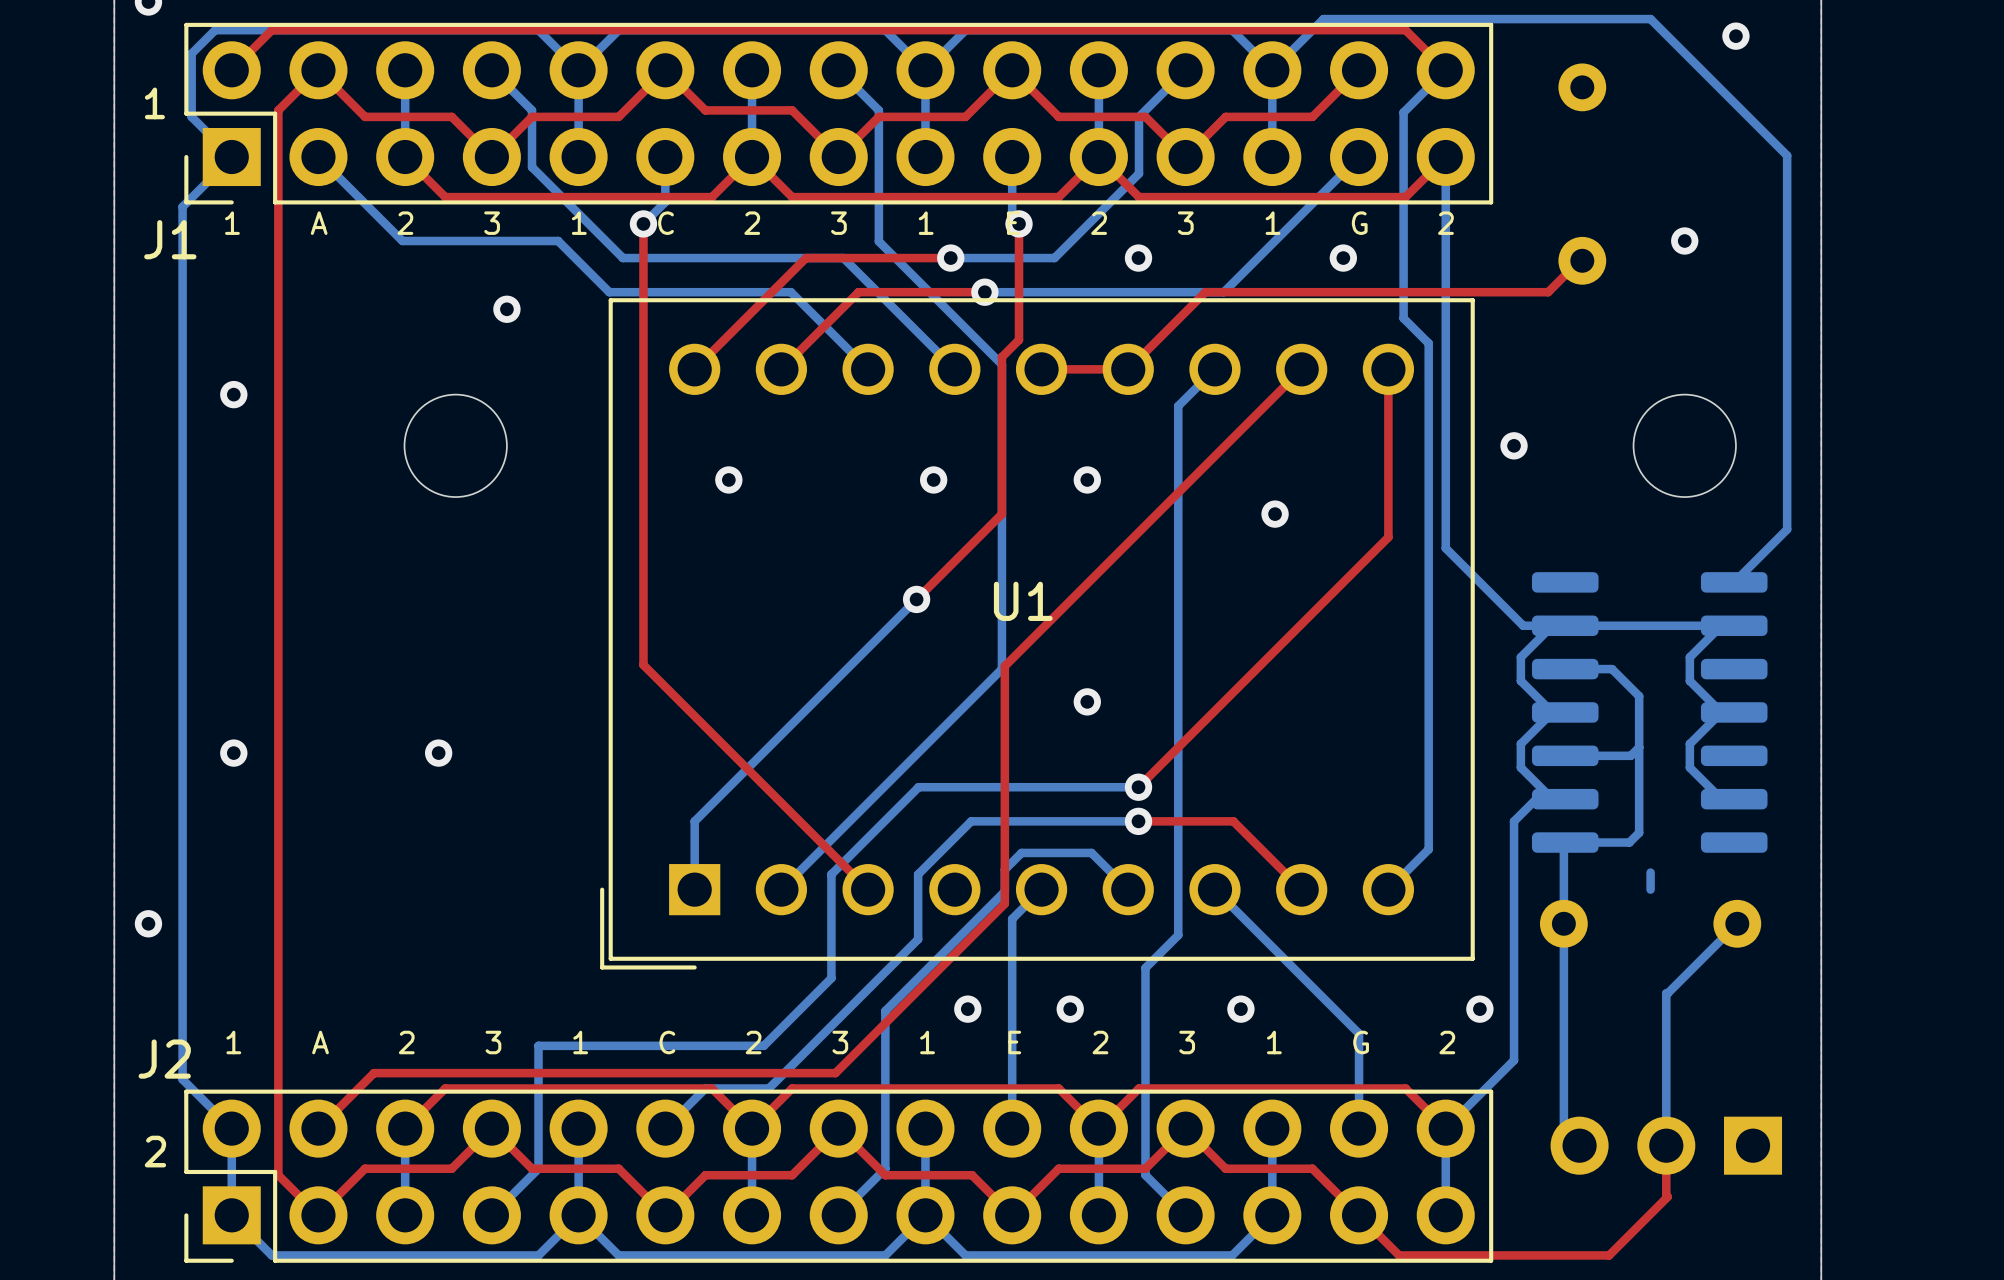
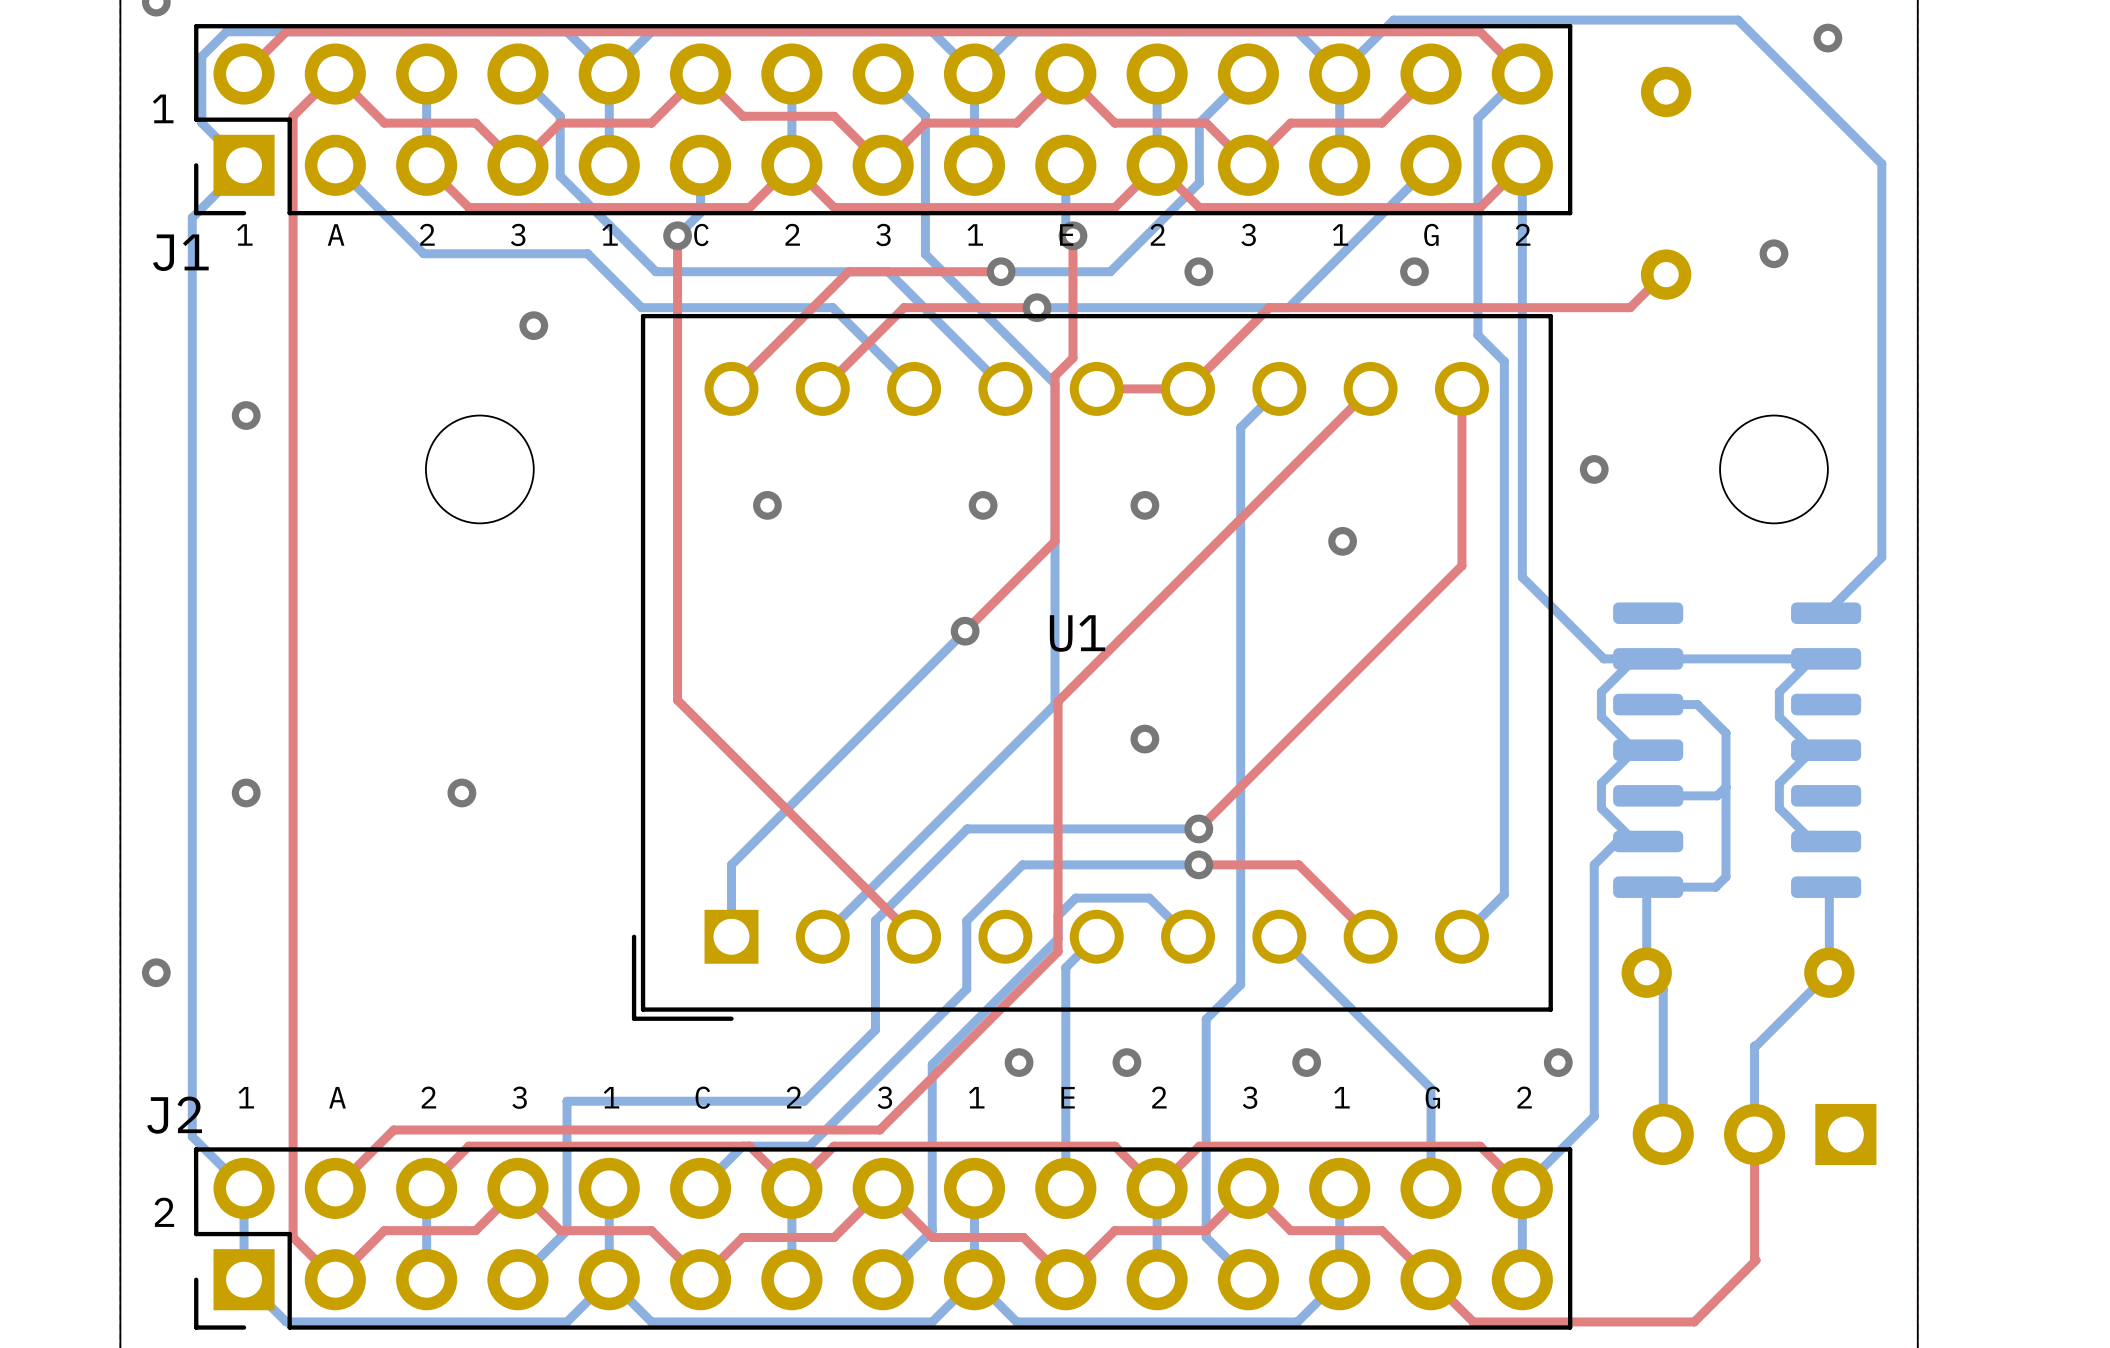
bottom track: none -> (1827, 888) (1829, 972)
bottom track: (1650, 872) (1650, 889) -> none
bottom track: (1563, 923) (1563, 1129) -> (1646, 972) (1663, 989) (1663, 1134) (1645, 1116)
bottom track: (1666, 1077) (1666, 1145) -> none
top track: none -> (1754, 1134) (1754, 1206)
part position: (1666, 1145) -> (1754, 1134)

